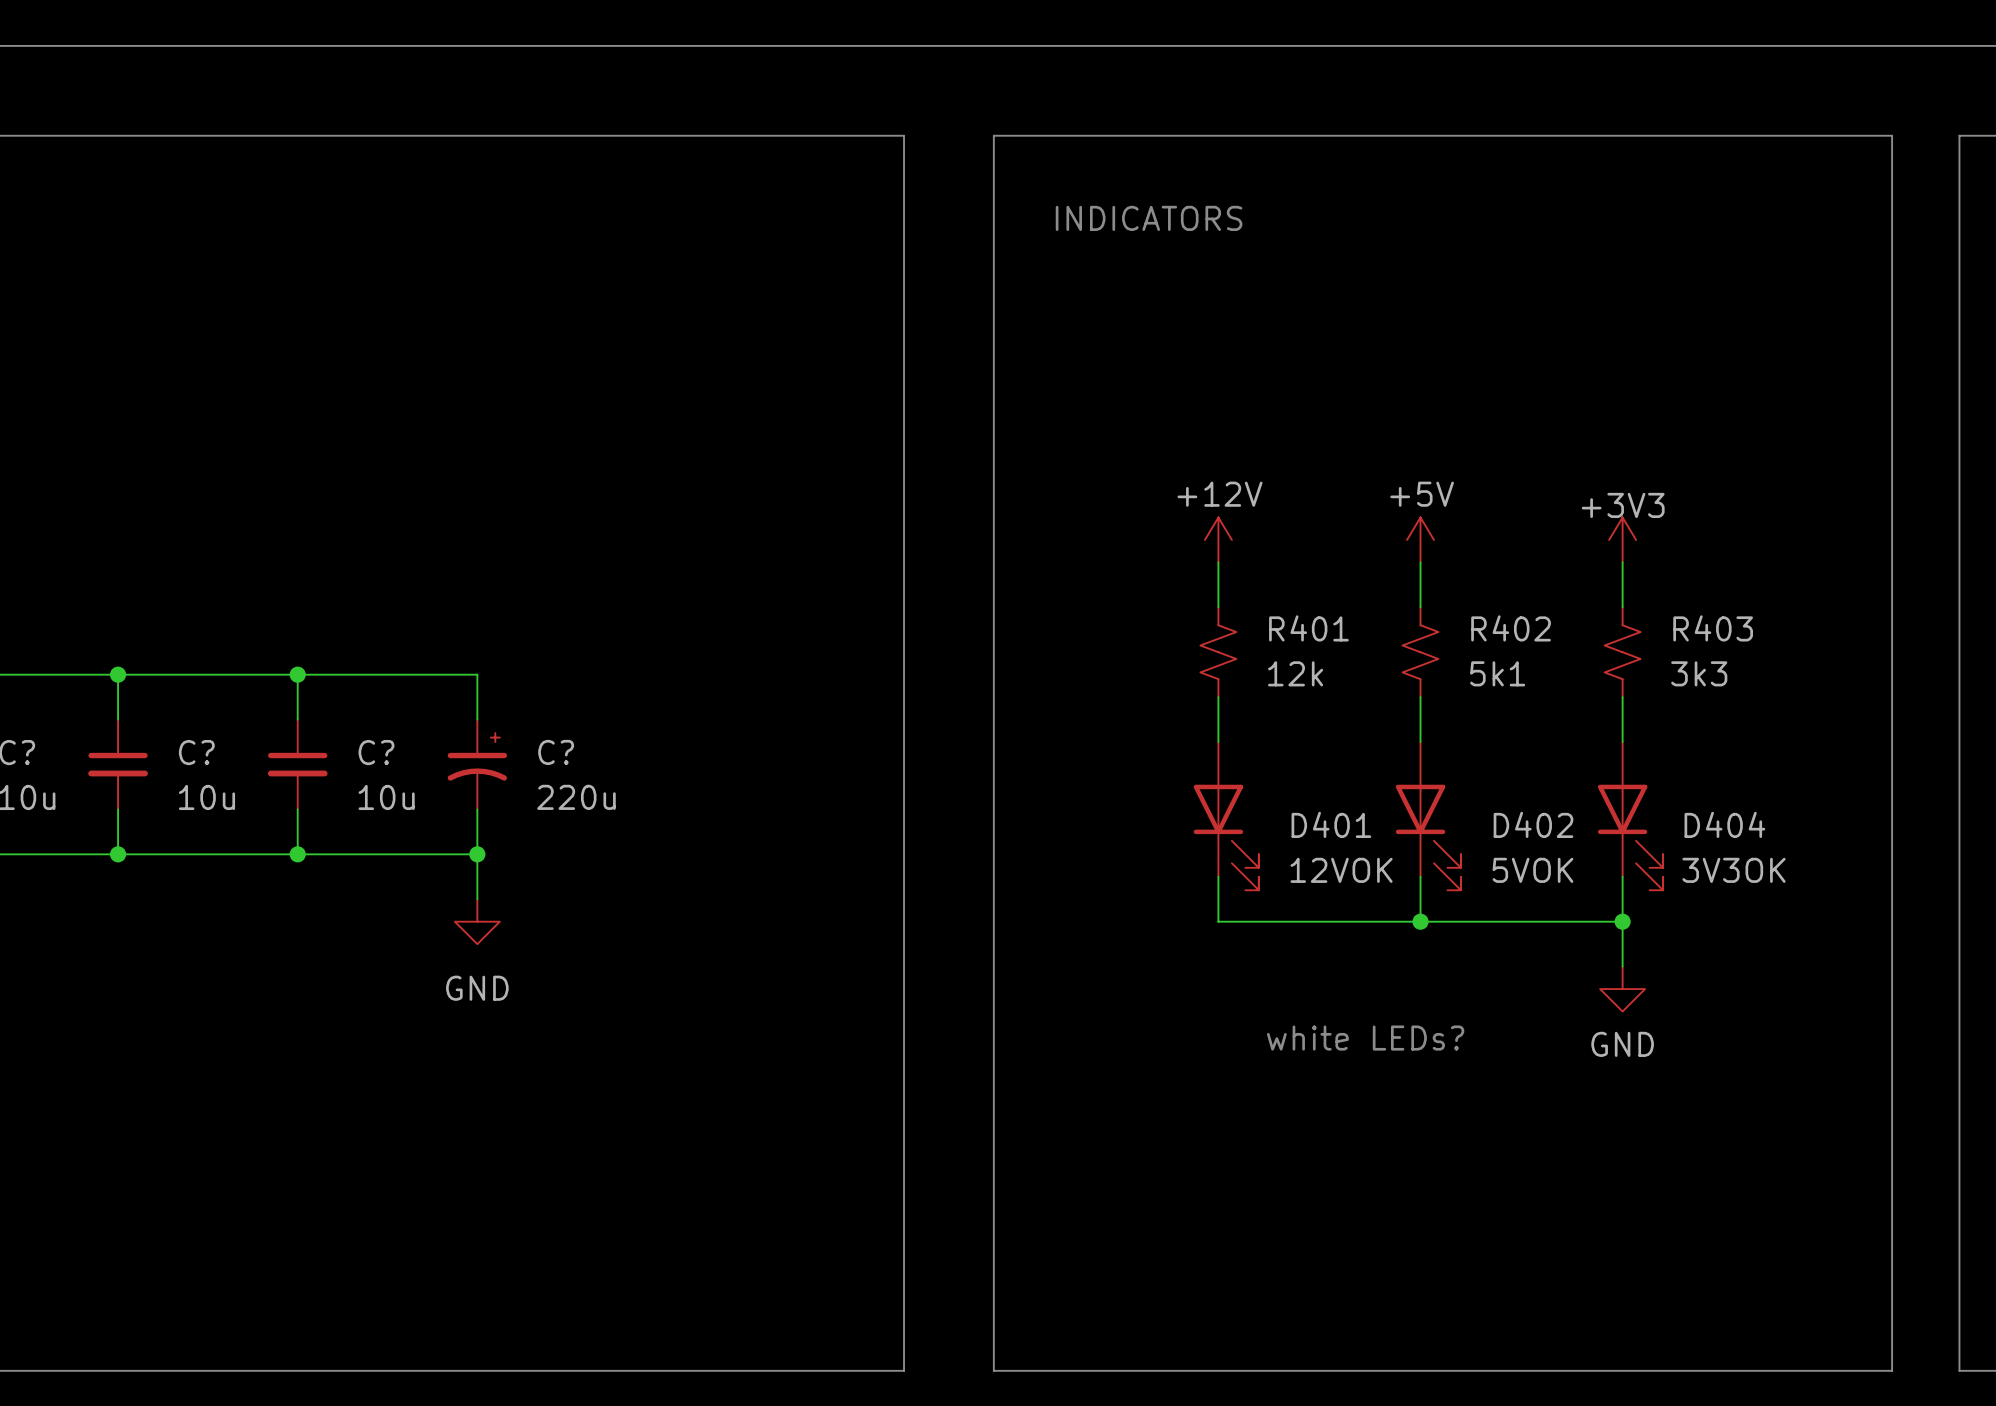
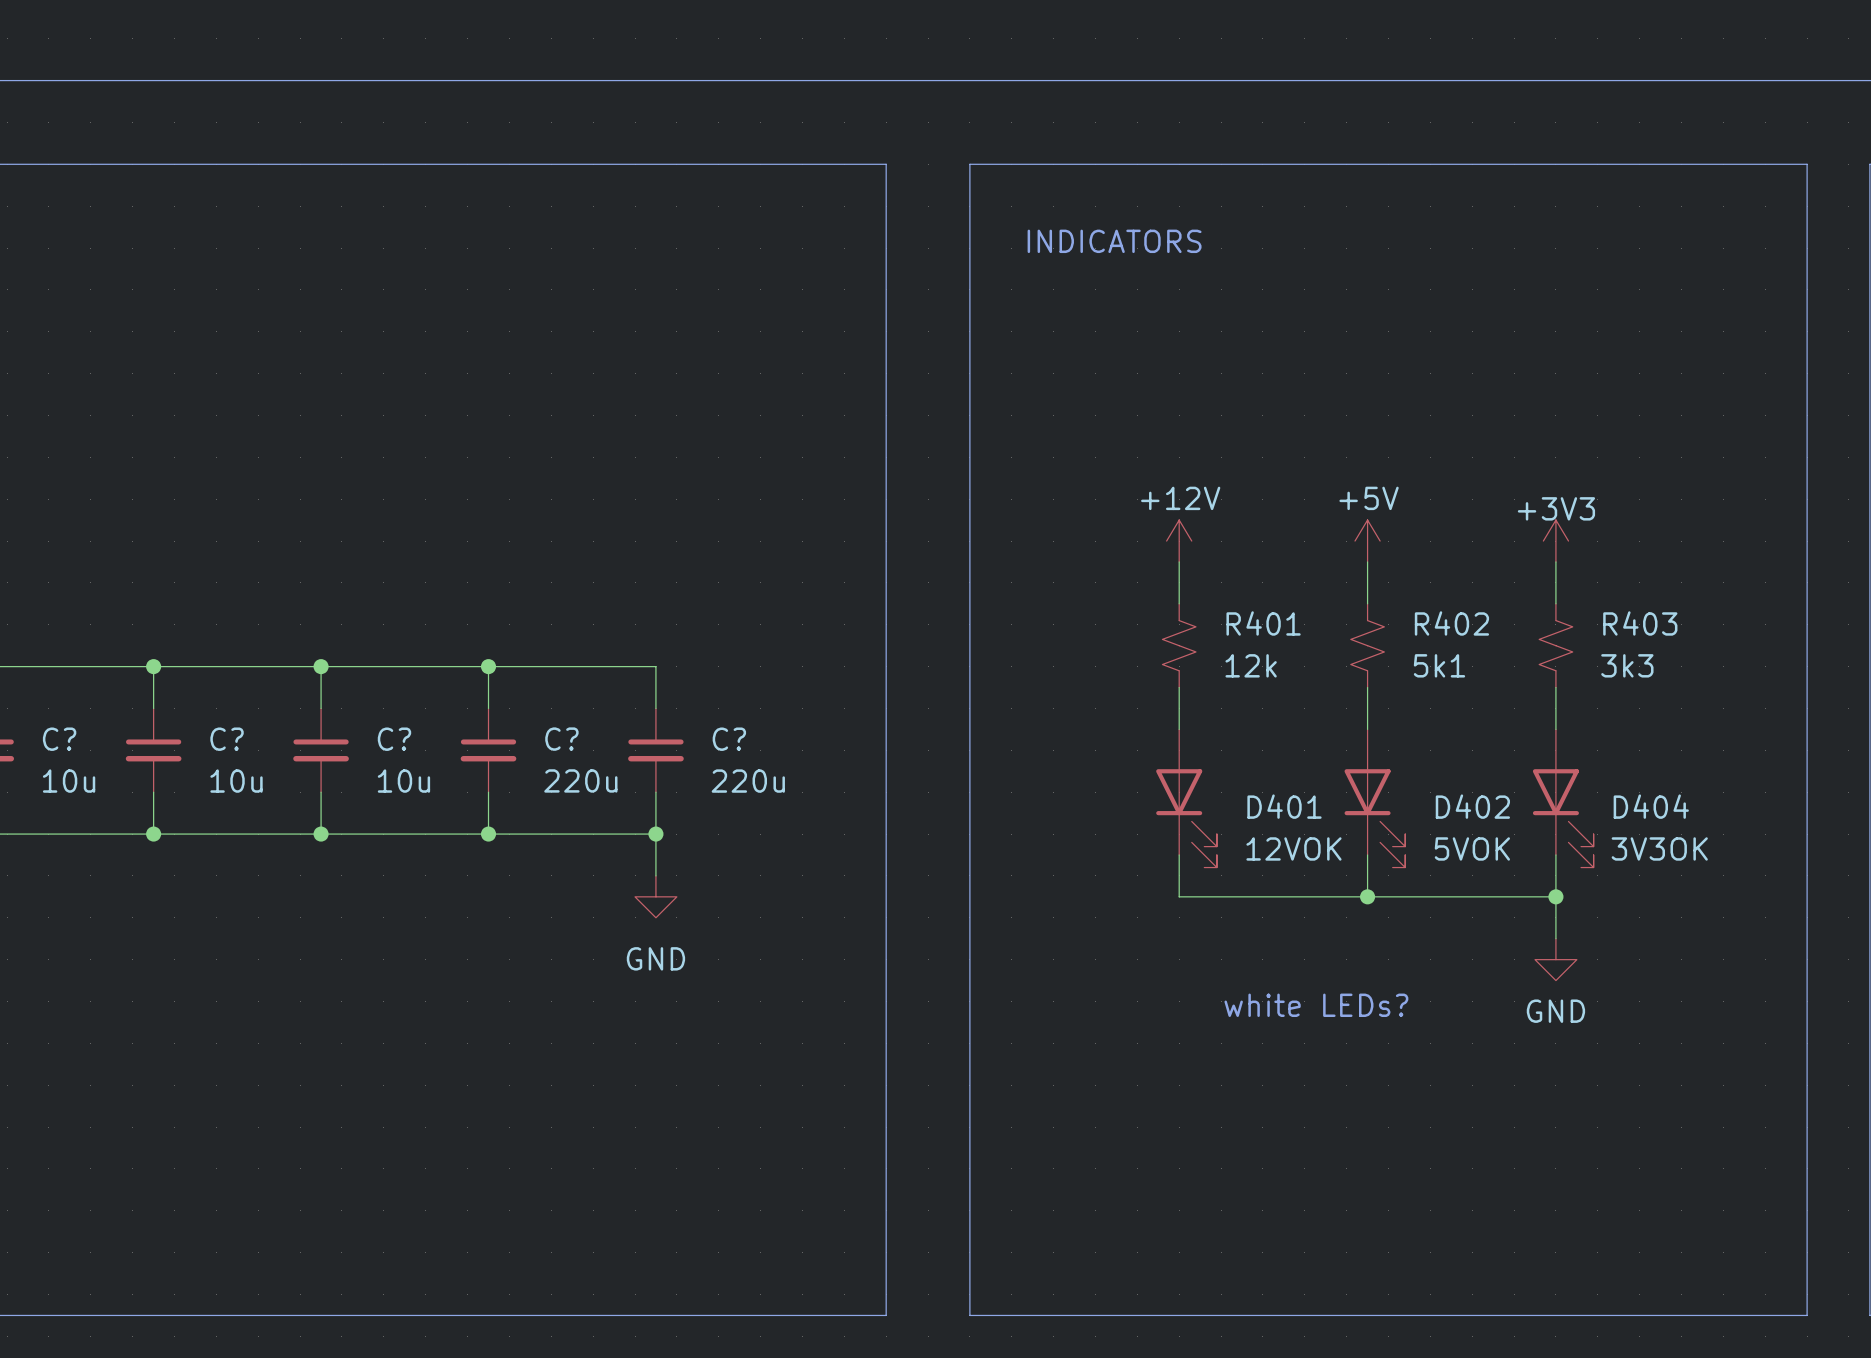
wire: none -> (488, 666) (655, 666) (655, 708)
junction: none -> (488, 666)
C? symbol: [447, 719, 508, 810] -> [460, 708, 517, 793]
C?: none -> 220u (655, 750)
wire: none -> (655, 792) (655, 875)
wire: (477, 854) (477, 899) -> (488, 834) (655, 834)
junction: none -> (655, 834)
power symbol position: GND (477, 921) -> GND (655, 896)

